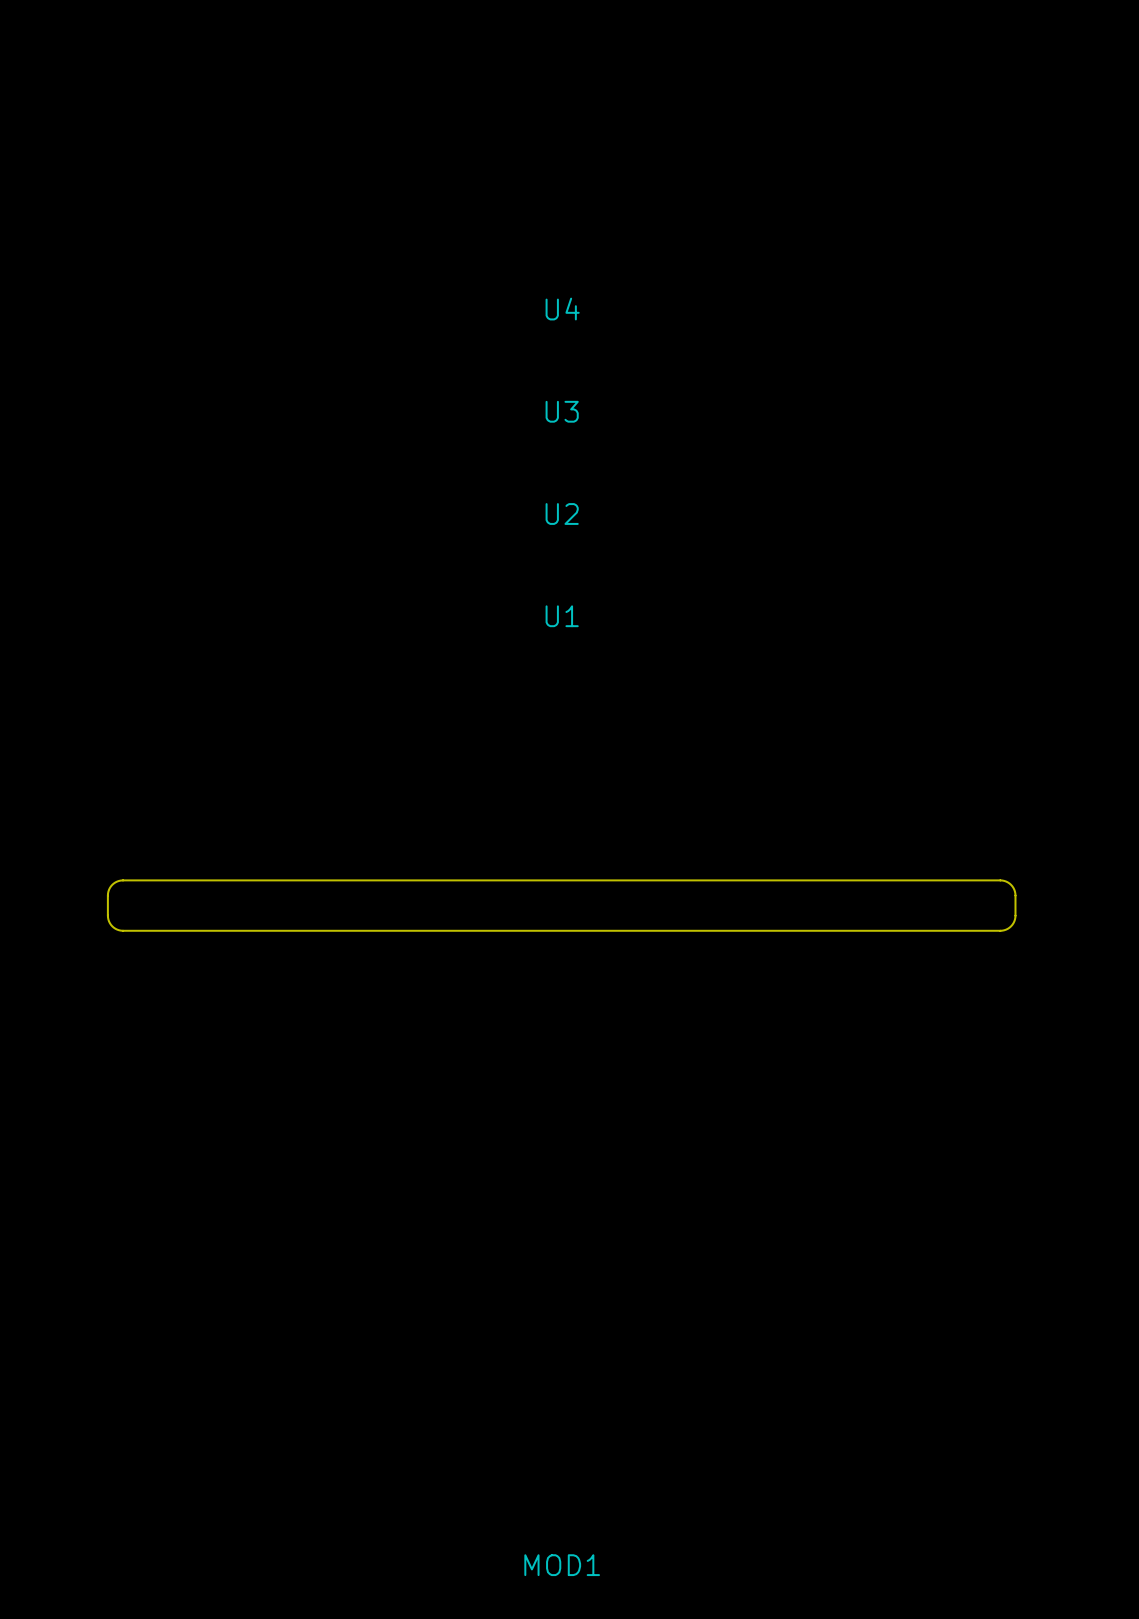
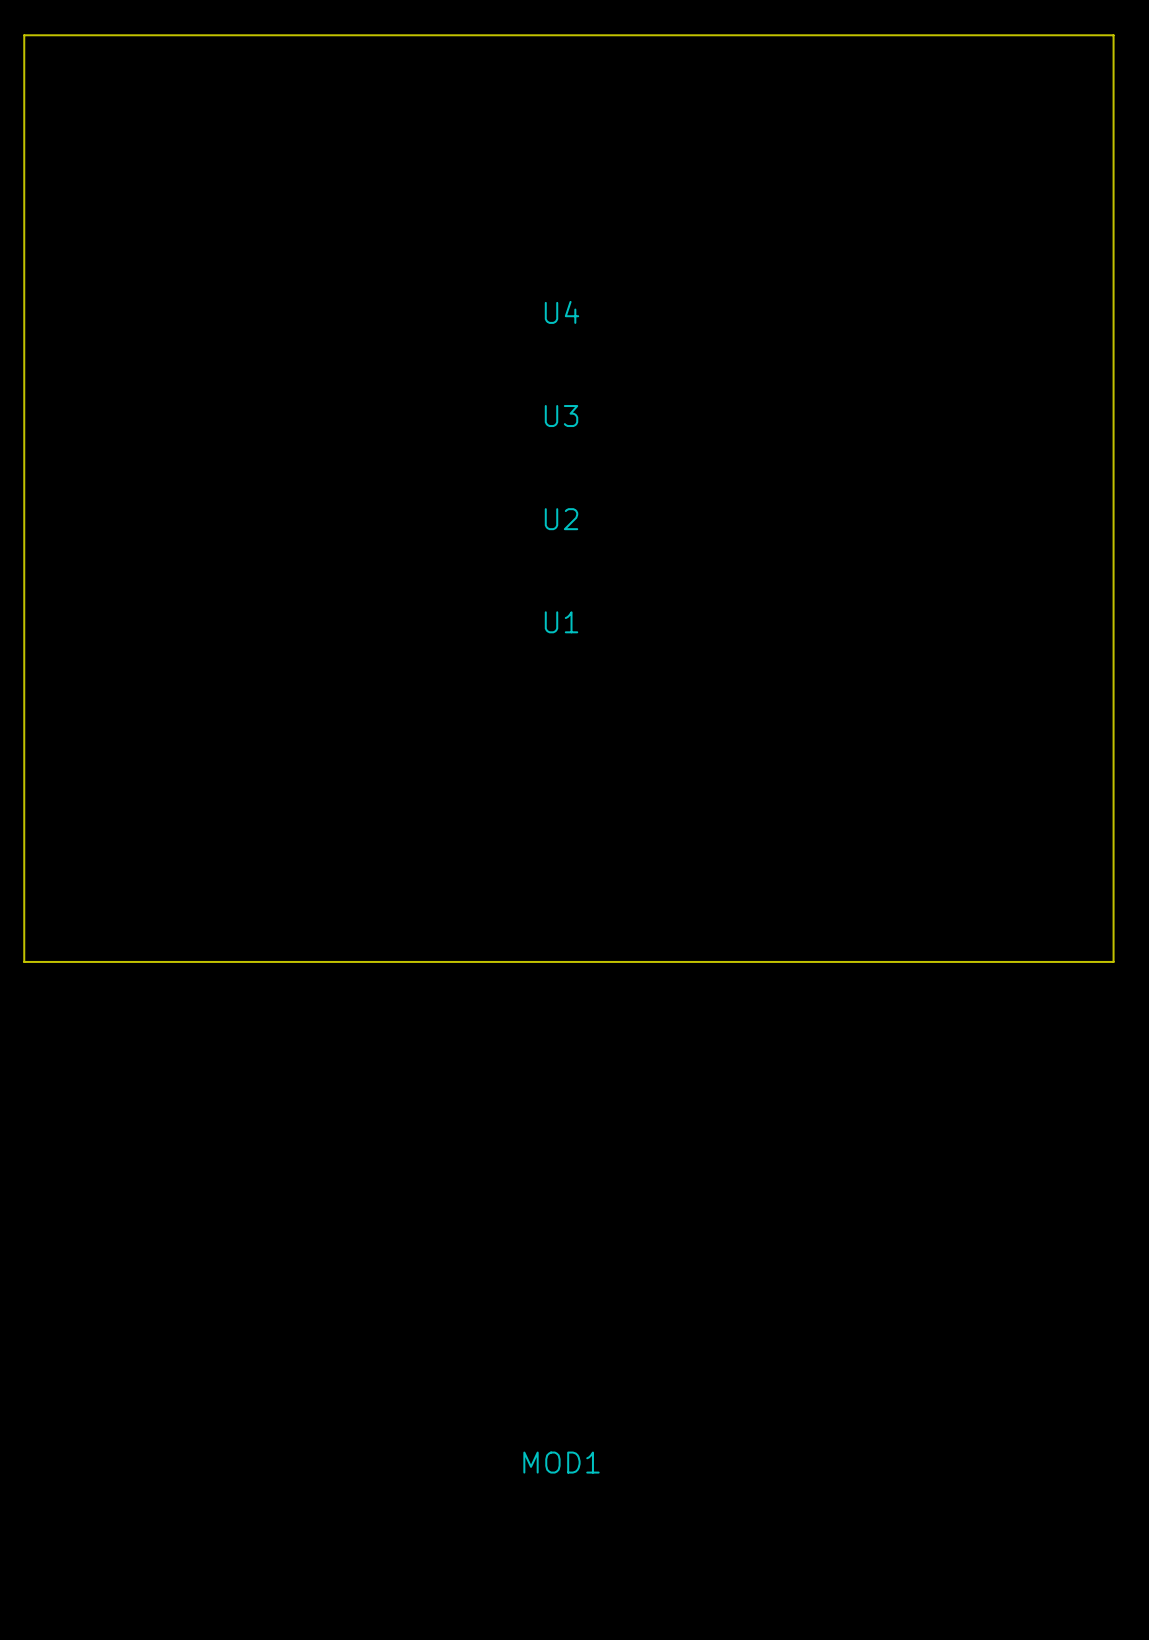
board edge: none -> (24, 35) (1113, 35) (1113, 961) (24, 961) (24, 35)
board edge: (123, 880) (1000, 880) (1007, 882) (1014, 889) (1015, 915) (1011, 926) (1000, 930) (123, 930) (112, 926) (107, 915) (109, 889) (113, 883) (123, 880) -> none
MOD1 position: (562, 1565) -> (561, 1462)

